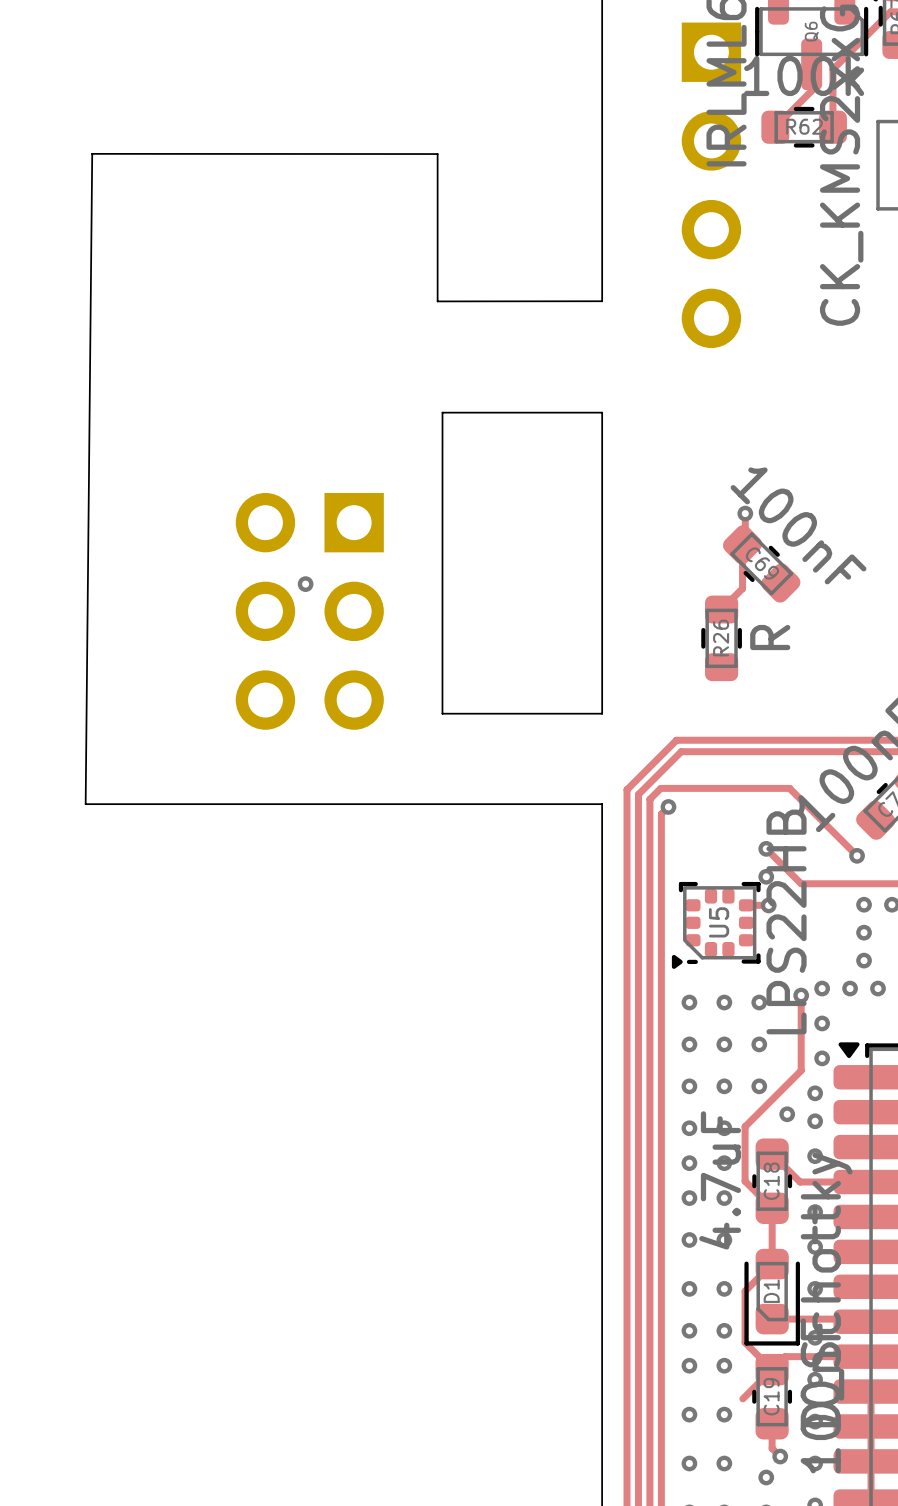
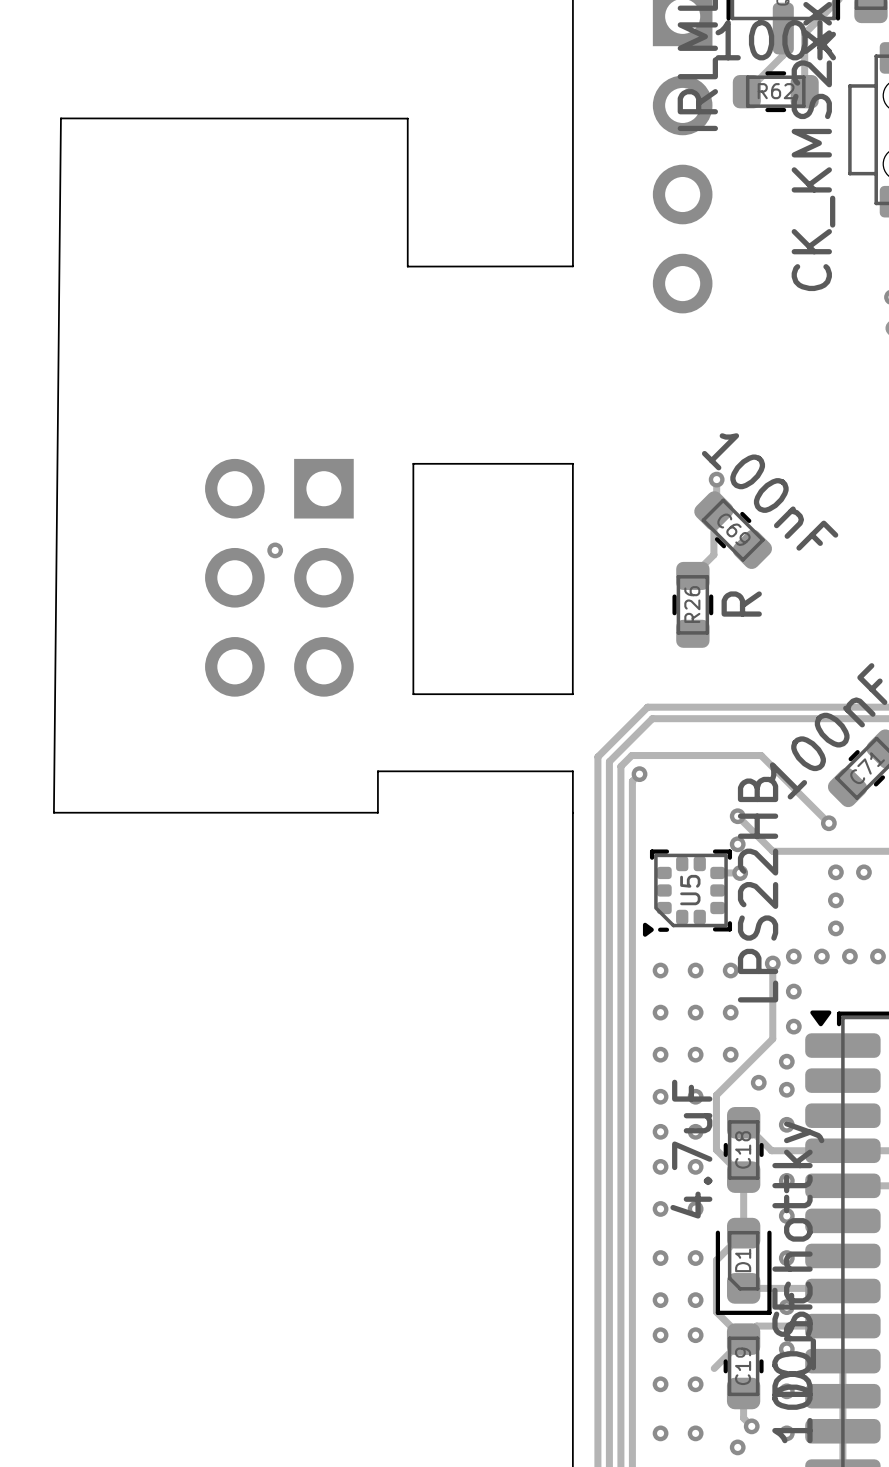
board edge: (442, 412) (442, 713) (602, 713) (602, 412) (442, 412) -> (413, 463) (413, 694) (572, 694) (572, 463) (413, 463)
board edge: (85, 804) (602, 804) -> (54, 771) (53, 812) (377, 812) (377, 771) (572, 771)

